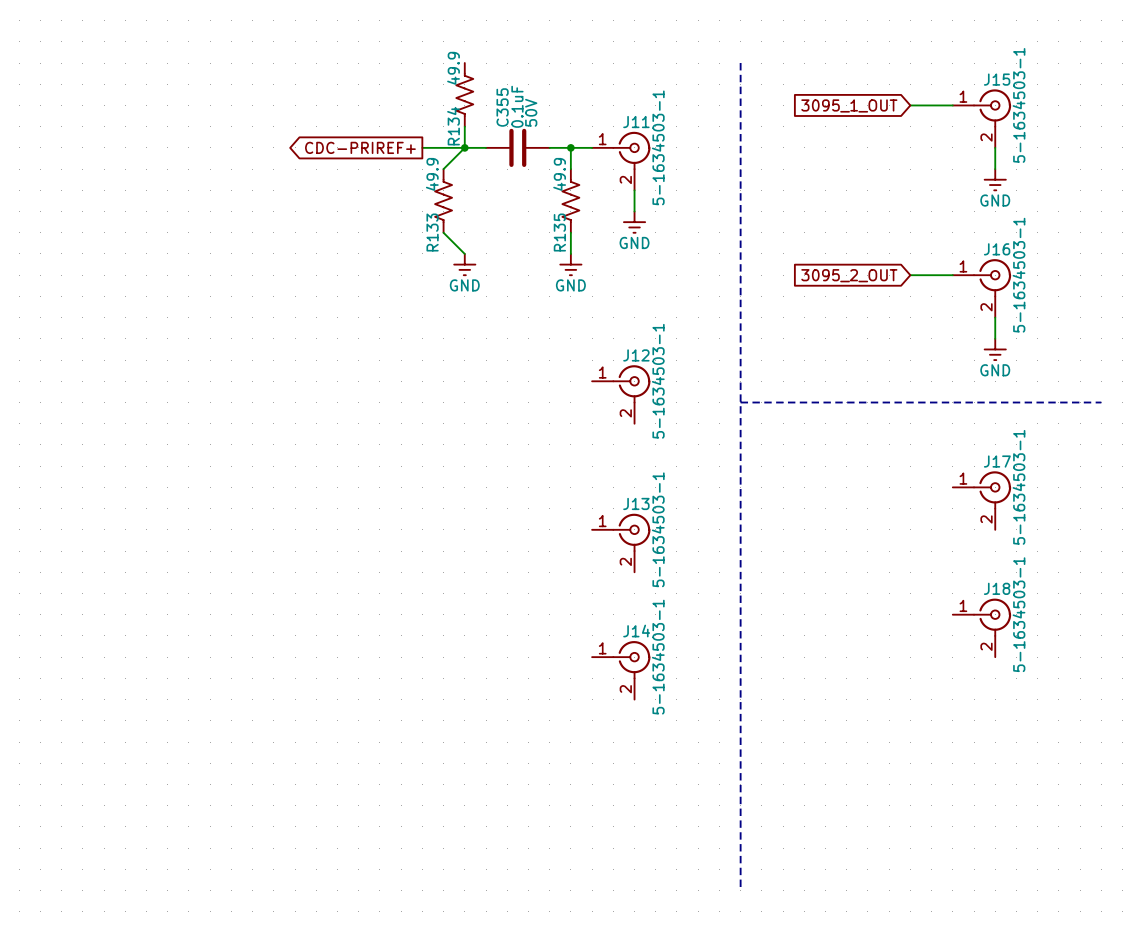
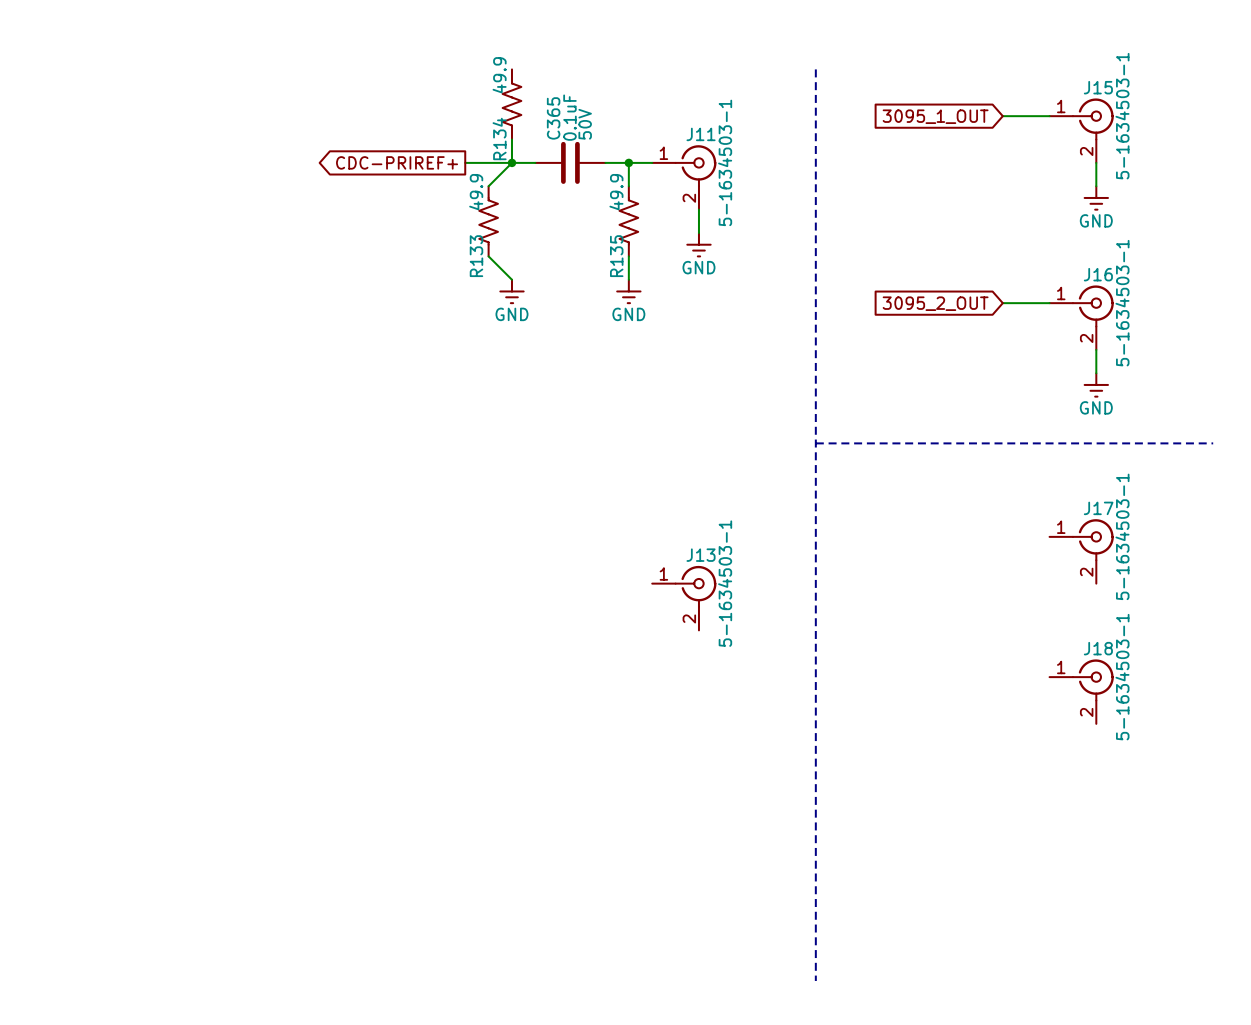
C355 name: C355 (502, 107) -> C365 (553, 118)
J12: 5-1634503-1 (621, 394) -> none
J14: 5-1634503-1 (621, 670) -> none

